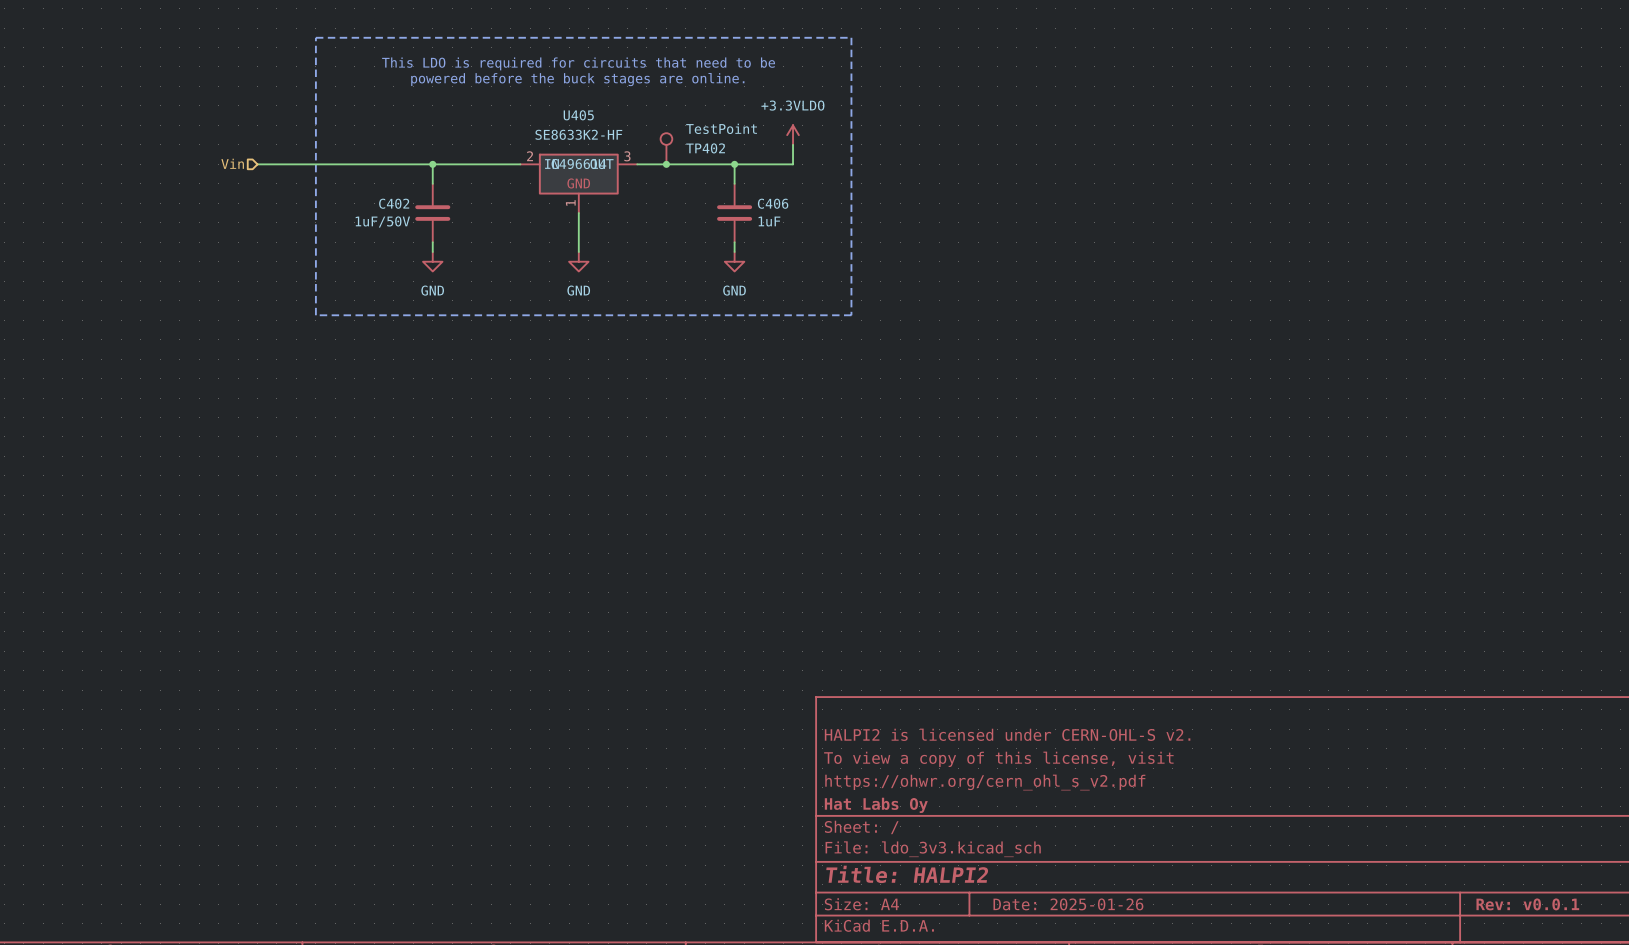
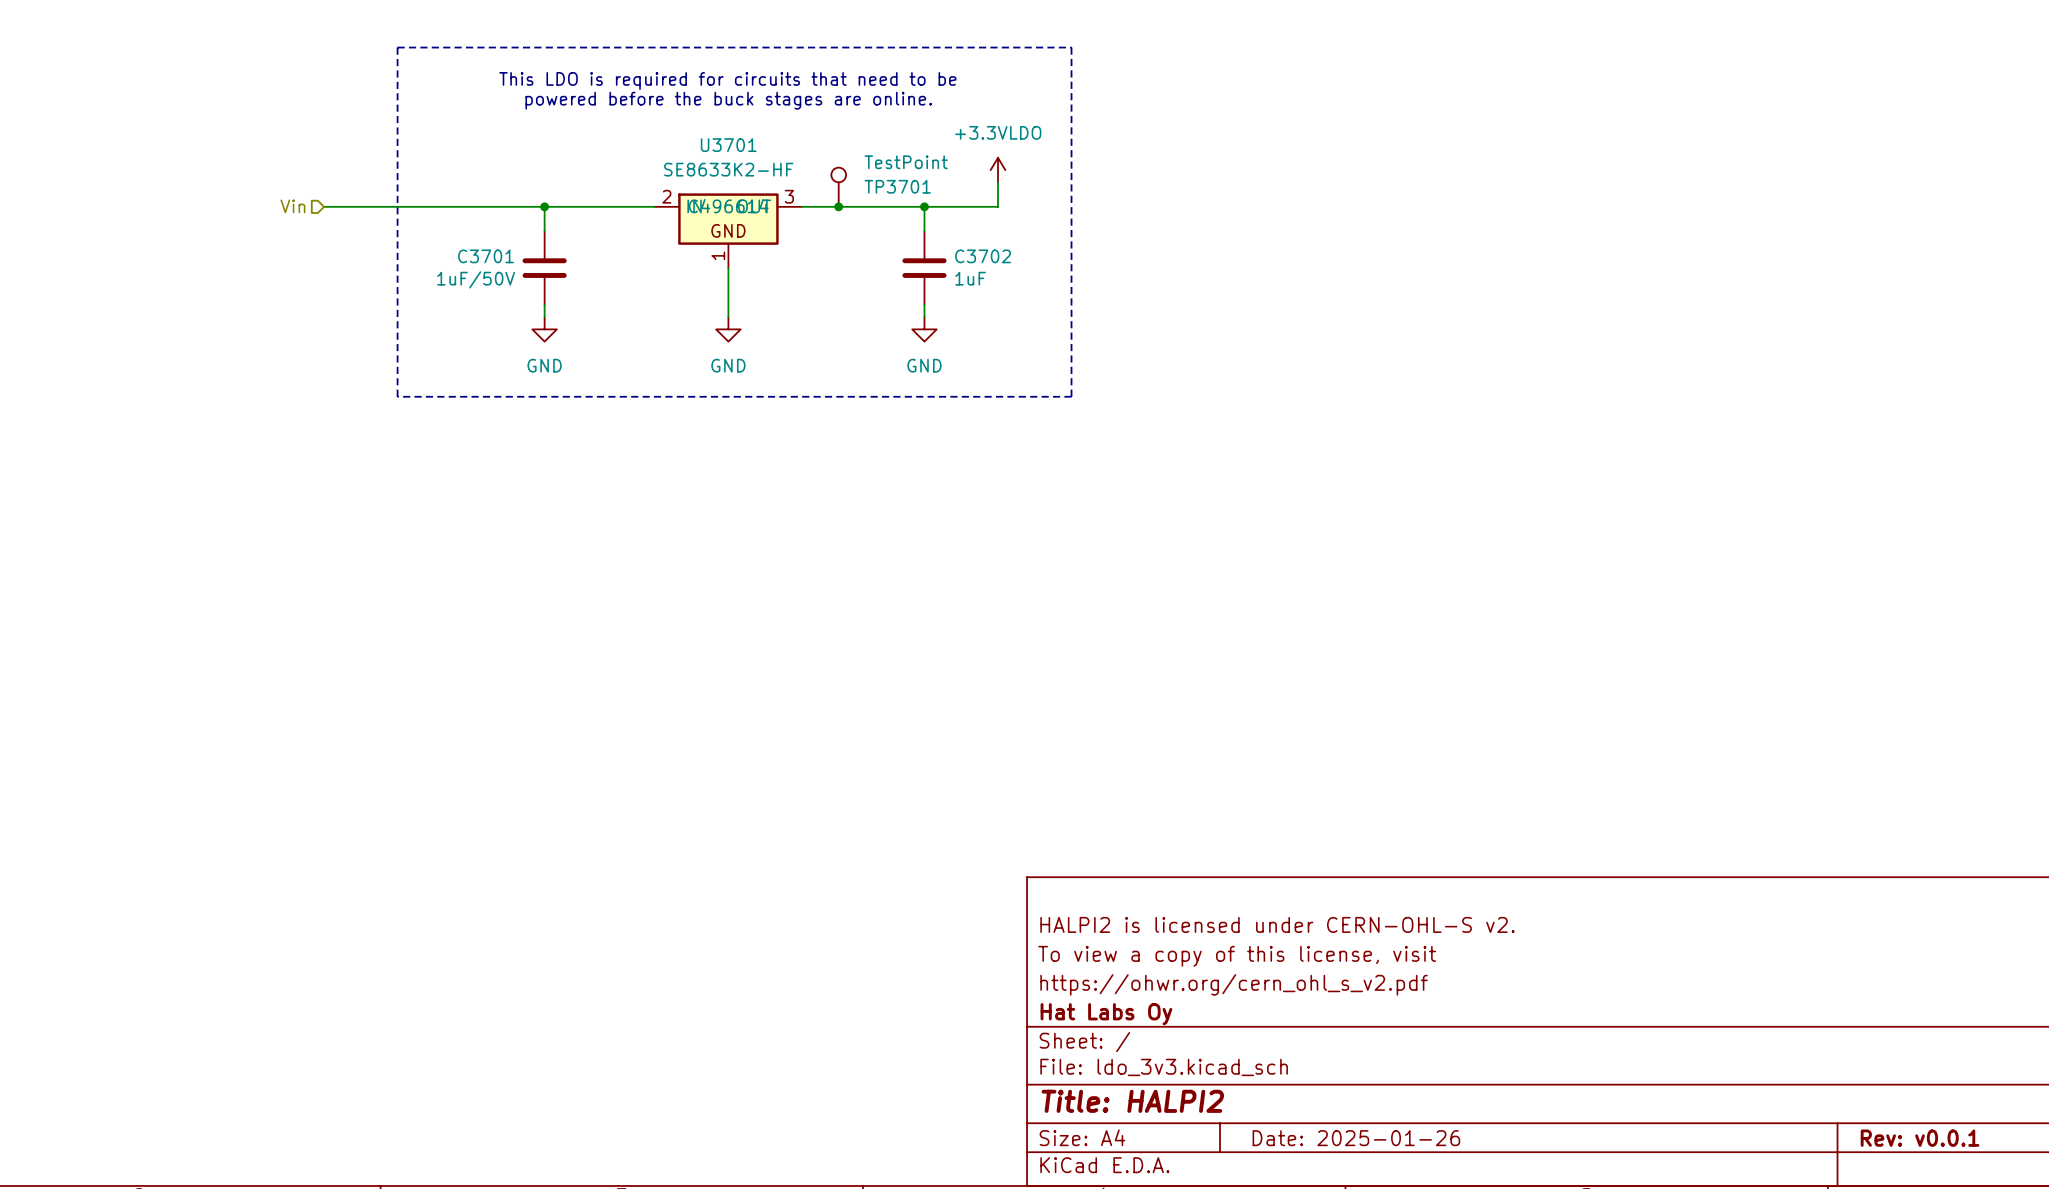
U405 name: U405 (578, 115) -> U3701 (728, 145)
TP402 name: TP402 (705, 148) -> TP3701 (897, 186)
C402 name: C402 (394, 203) -> C3701 (485, 256)
C406 name: C406 (773, 203) -> C3702 (983, 256)

